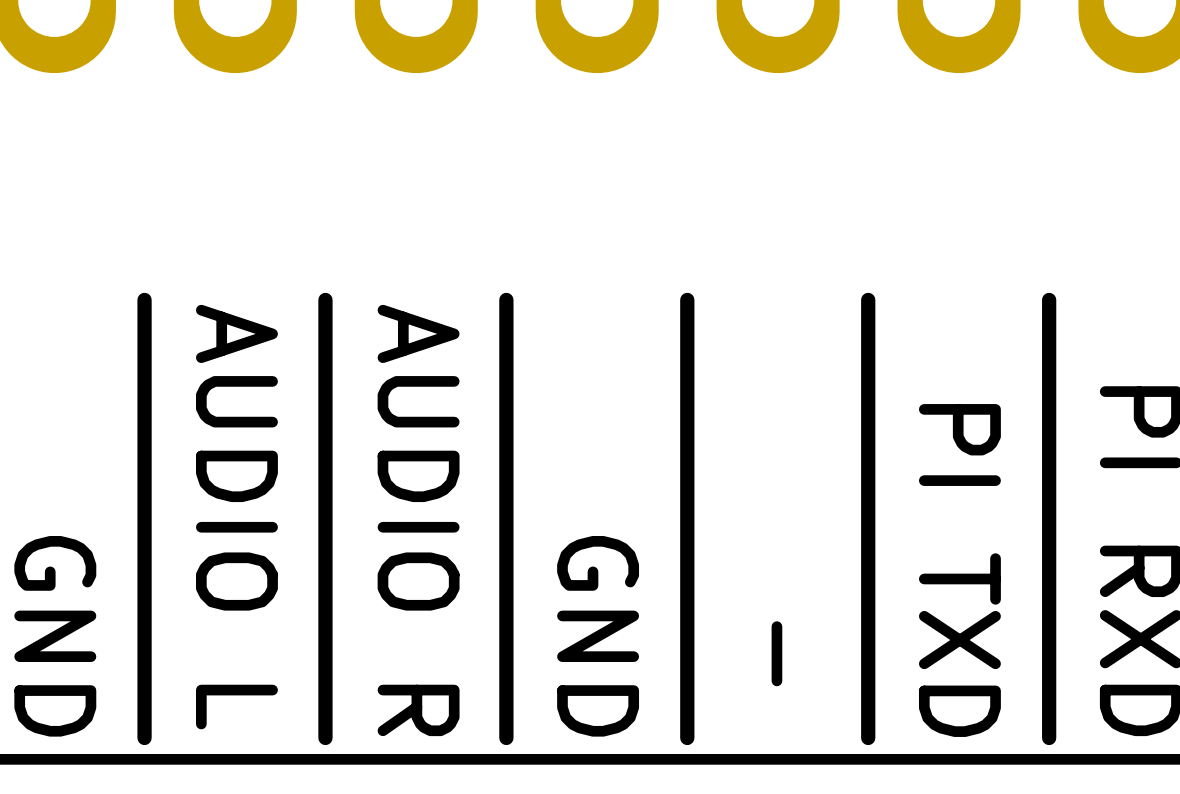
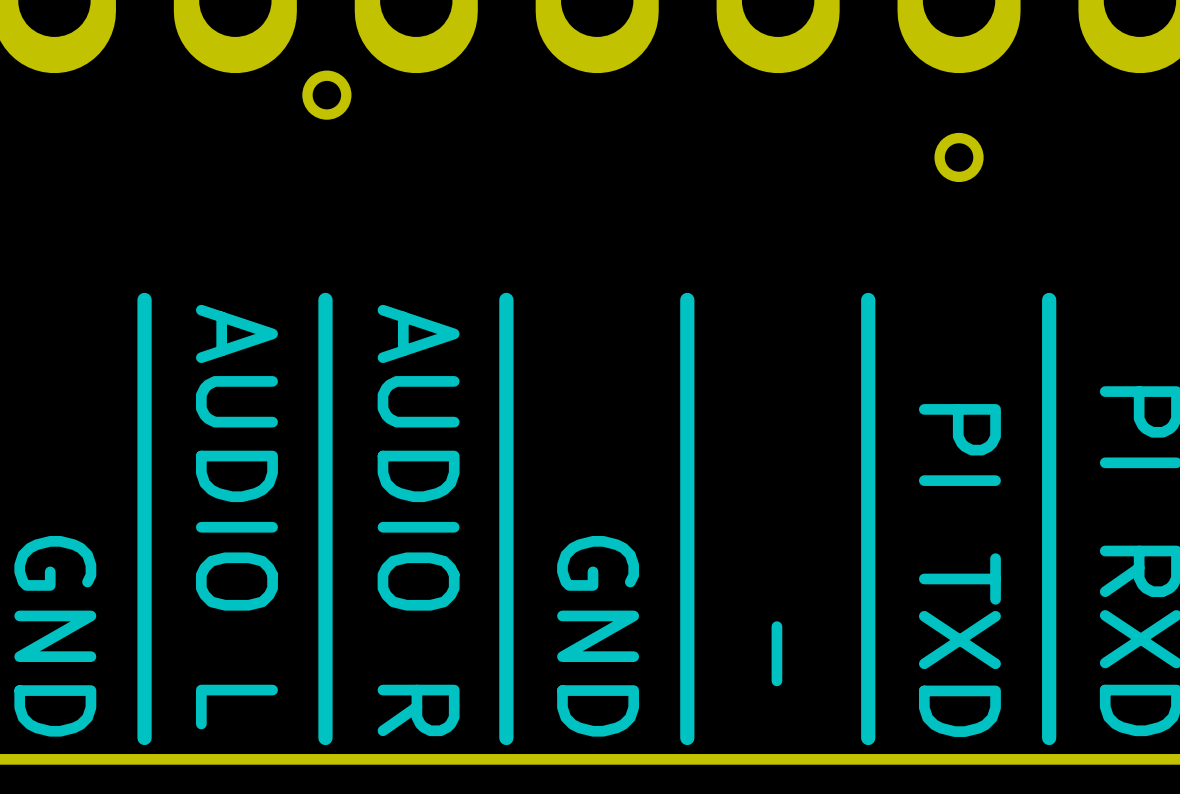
part: none -> (326, 95)
part: none -> (959, 157)

